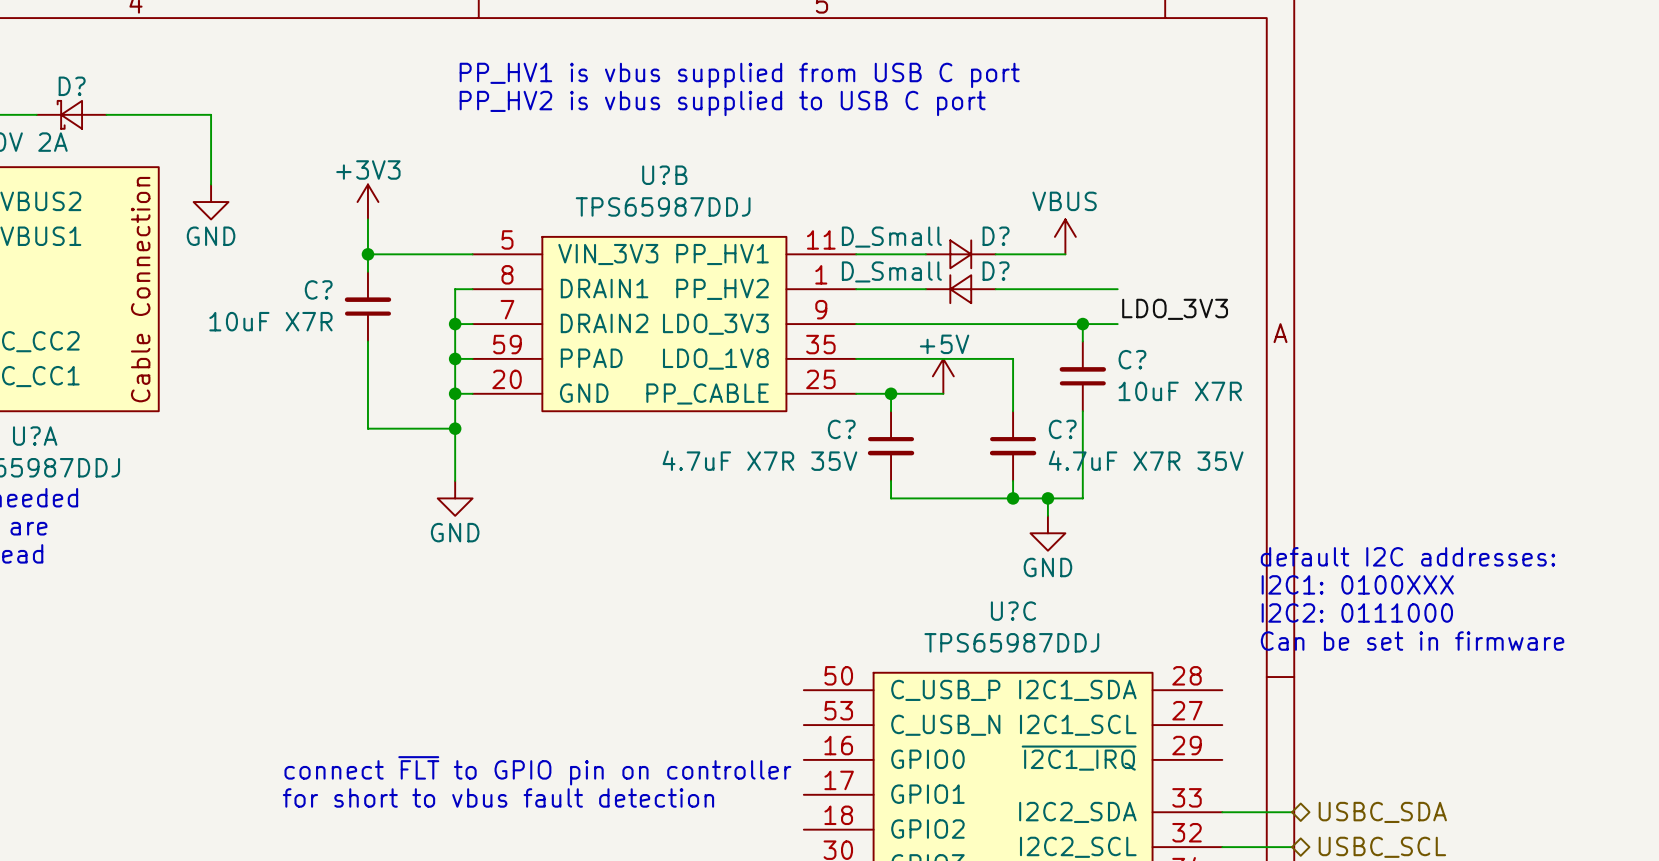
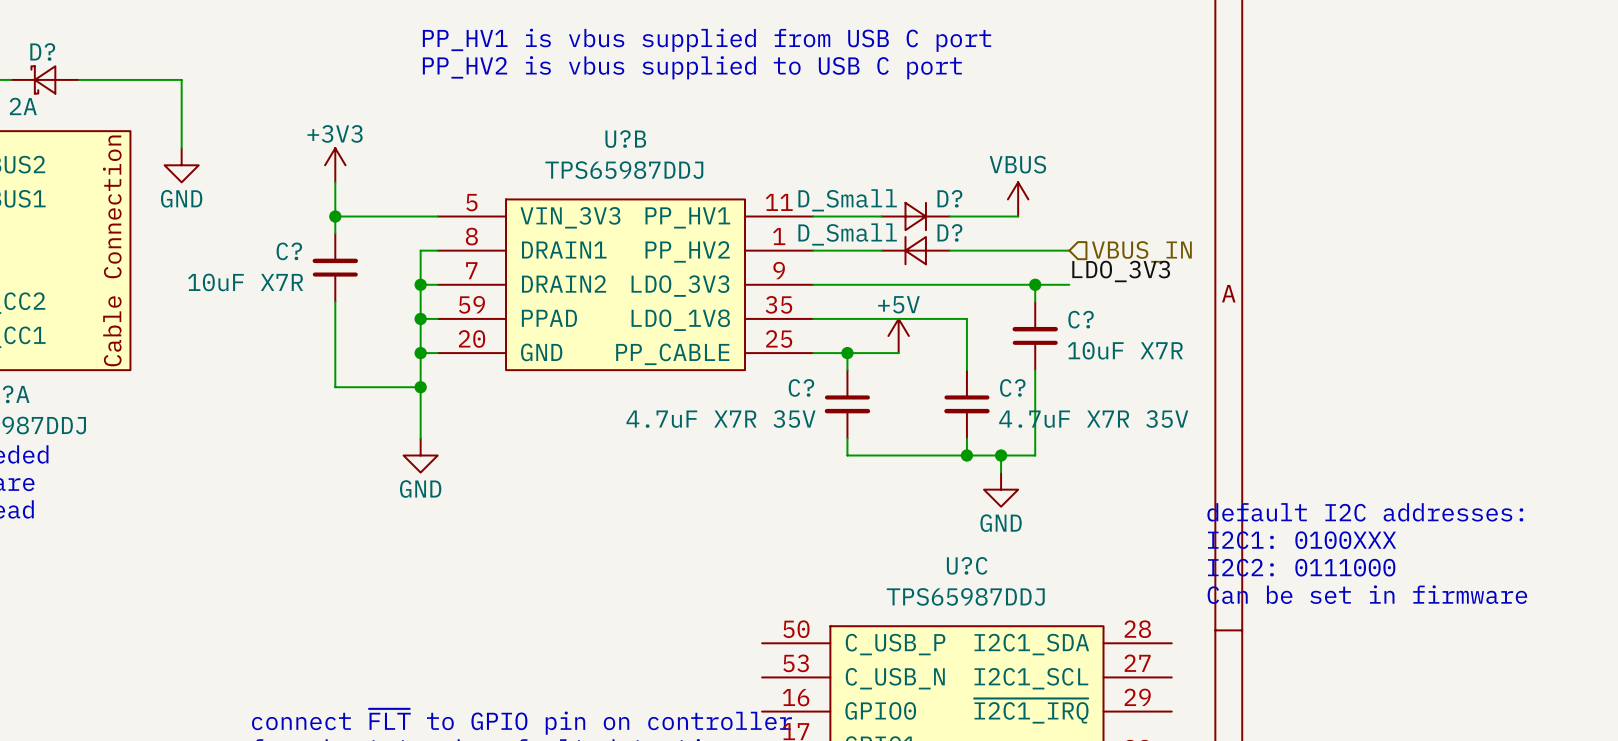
hierarchical label: none -> VBUS_IN (1141, 251)

